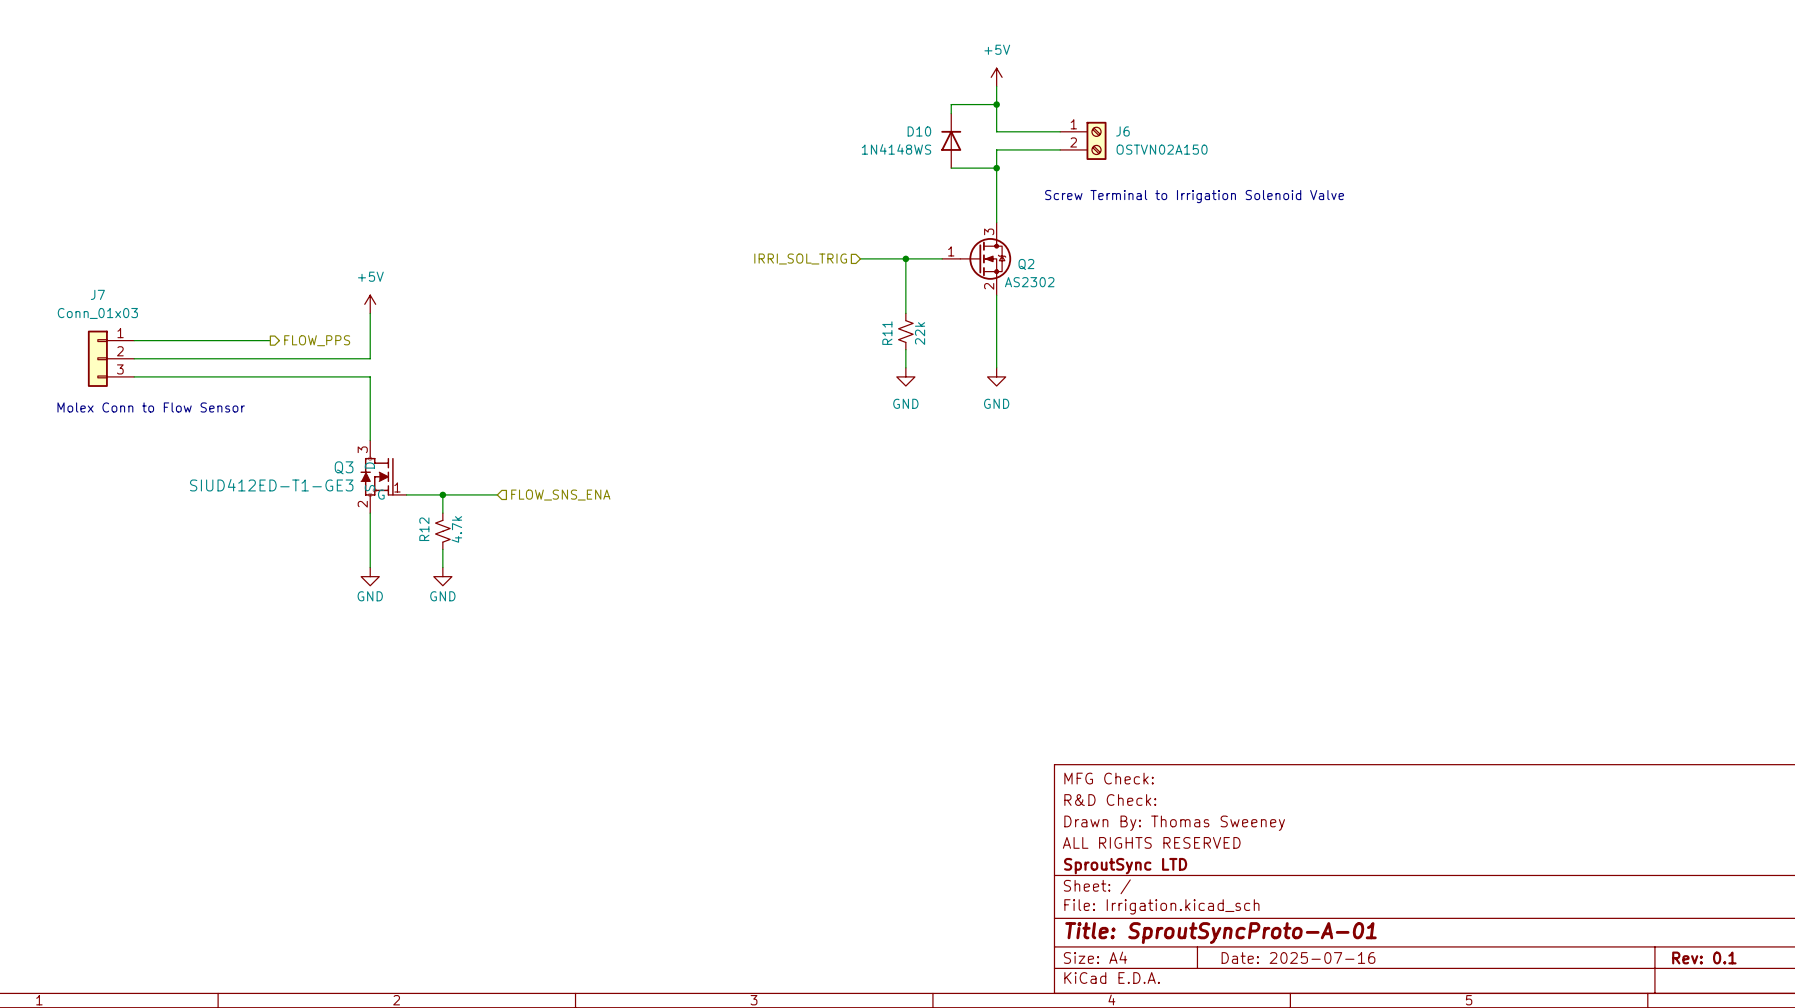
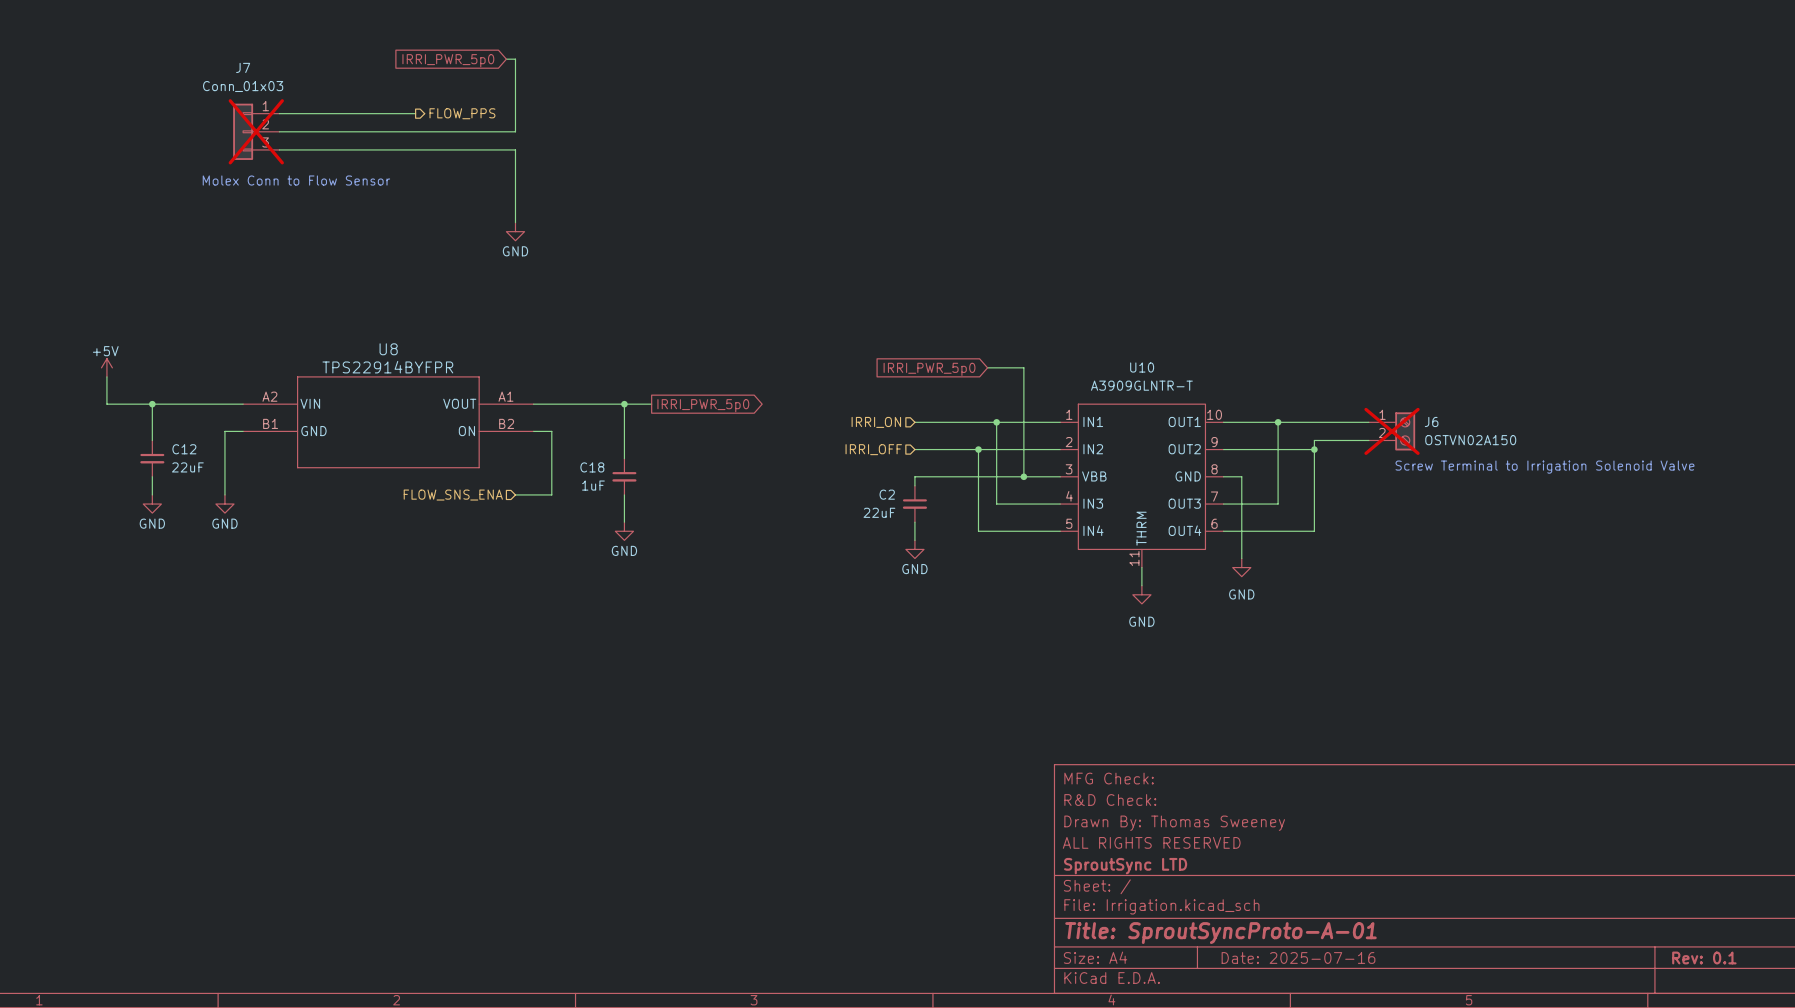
wire: none -> (506, 59) (515, 59) (515, 131) (279, 131)
global label: none -> IRRI_PWR_5p0 (448, 60)
power symbol: +5V (996, 77) -> none
wire: (996, 86) (996, 131) (1060, 131) -> none
wire: (996, 104) (951, 104) (951, 113) -> none
junction: (996, 104) -> none
wire: none -> (279, 113) (415, 113)
hierarchical label: none -> FLOW_PPS (462, 113)
J7 do-not-place cross: none -> (256, 131)
D10: 1N4148WS (951, 140) -> none
J6 position: (1083, 140) -> (1392, 431)
wire: none -> (279, 149) (515, 149) (515, 222)
wire: (1060, 149) (996, 149) (996, 222) -> none
wire: (951, 168) (996, 168) -> none
junction: (996, 168) -> none
text: none -> Molex Conn to Flow Sensor (296, 180)
text: Screw Terminal to Irrigation Solenoid Valve (1194, 196) -> none
power symbol: none -> GND (515, 231)
wire: (860, 258) (942, 258) -> none
wire: (905, 258) (905, 313) -> none
junction: (905, 258) -> none
Q2: AS2302 (976, 258) -> none
hierarchical label: IRRI_SOL_TRIG (800, 259) -> none
wire: (996, 295) (996, 367) -> none
power symbol: +5V (370, 304) -> none
wire: (370, 313) (370, 358) (134, 358) -> none
R11: 22k (905, 331) -> none
wire: (134, 340) (270, 340) -> none
hierarchical label: FLOW_PPS (317, 340) -> none
wire: (905, 349) (905, 367) -> (914, 522) (914, 540)
J7 position: (111, 358) -> (256, 131)
power symbol: none -> +5V (106, 367)
wire: none -> (987, 367) (1023, 367) (1023, 476)
global label: none -> IRRI_PWR_5p0 (929, 369)
wire: none -> (106, 376) (106, 404) (243, 404)
wire: (134, 376) (370, 376) (370, 440) -> none
power symbol: GND (905, 376) -> none
power symbol: GND (996, 376) -> none
wire: none -> (152, 404) (152, 440)
junction: none -> (152, 404)
wire: none -> (533, 404) (651, 404)
wire: none -> (624, 404) (624, 458)
junction: none -> (624, 404)
global label: none -> IRRI_PWR_5p0 (703, 405)
text: Molex Conn to Flow Sensor (151, 407) -> none
U8: none -> TPS22914BYFPR (388, 422)
hierarchical label: none -> IRRI_ON (876, 422)
wire: none -> (914, 422) (1060, 422)
wire: none -> (996, 422) (996, 504) (1060, 504)
junction: none -> (996, 422)
wire: none -> (1223, 422) (1368, 422)
wire: none -> (1278, 422) (1278, 504) (1223, 504)
junction: none -> (1278, 422)
wire: none -> (243, 431) (224, 431) (224, 494)
wire: none -> (533, 431) (551, 431) (551, 494) (515, 494)
J6 do-not-place cross: none -> (1392, 431)
wire: none -> (1368, 440) (1314, 440) (1314, 531) (1223, 531)
hierarchical label: none -> IRRI_OFF (873, 449)
wire: none -> (914, 449) (1060, 449)
wire: none -> (978, 449) (978, 531) (1060, 531)
junction: none -> (978, 449)
wire: none -> (1223, 449) (1314, 449)
junction: none -> (1314, 449)
C12: none -> 22uF (152, 458)
text: none -> Screw Terminal to Irrigation Solenoid Valve (1544, 467)
wire: none -> (152, 476) (152, 494)
Q3: SIUD412ED-T1-GE3 (383, 476) -> none
C18: none -> 1uF (624, 476)
junction: none -> (1023, 476)
wire: none -> (1060, 476) (914, 476) (914, 485)
wire: none -> (1223, 476) (1241, 476) (1241, 558)
U10: none -> A3909GLNTR-T (1141, 485)
wire: (406, 494) (497, 494) -> none
wire: (442, 494) (442, 513) -> none
junction: (442, 494) -> none
wire: none -> (624, 494) (624, 522)
hierarchical label rotation: 0° (560, 495) -> 180° (453, 495)
hierarchical label position: FLOW_SNS_ENA (560, 495) -> FLOW_SNS_ENA (453, 495)
power symbol: none -> GND (152, 504)
power symbol: none -> GND (224, 504)
C2: none -> 22uF (914, 504)
wire: (370, 513) (370, 567) -> none
R12: 4.7k (442, 531) -> none
power symbol: none -> GND (624, 531)
wire: (442, 549) (442, 567) -> none
power symbol: none -> GND (914, 549)
wire: none -> (1141, 567) (1141, 585)
power symbol: none -> GND (1241, 567)
power symbol: GND (370, 576) -> none
power symbol: GND (442, 576) -> none
power symbol: none -> GND (1141, 594)

